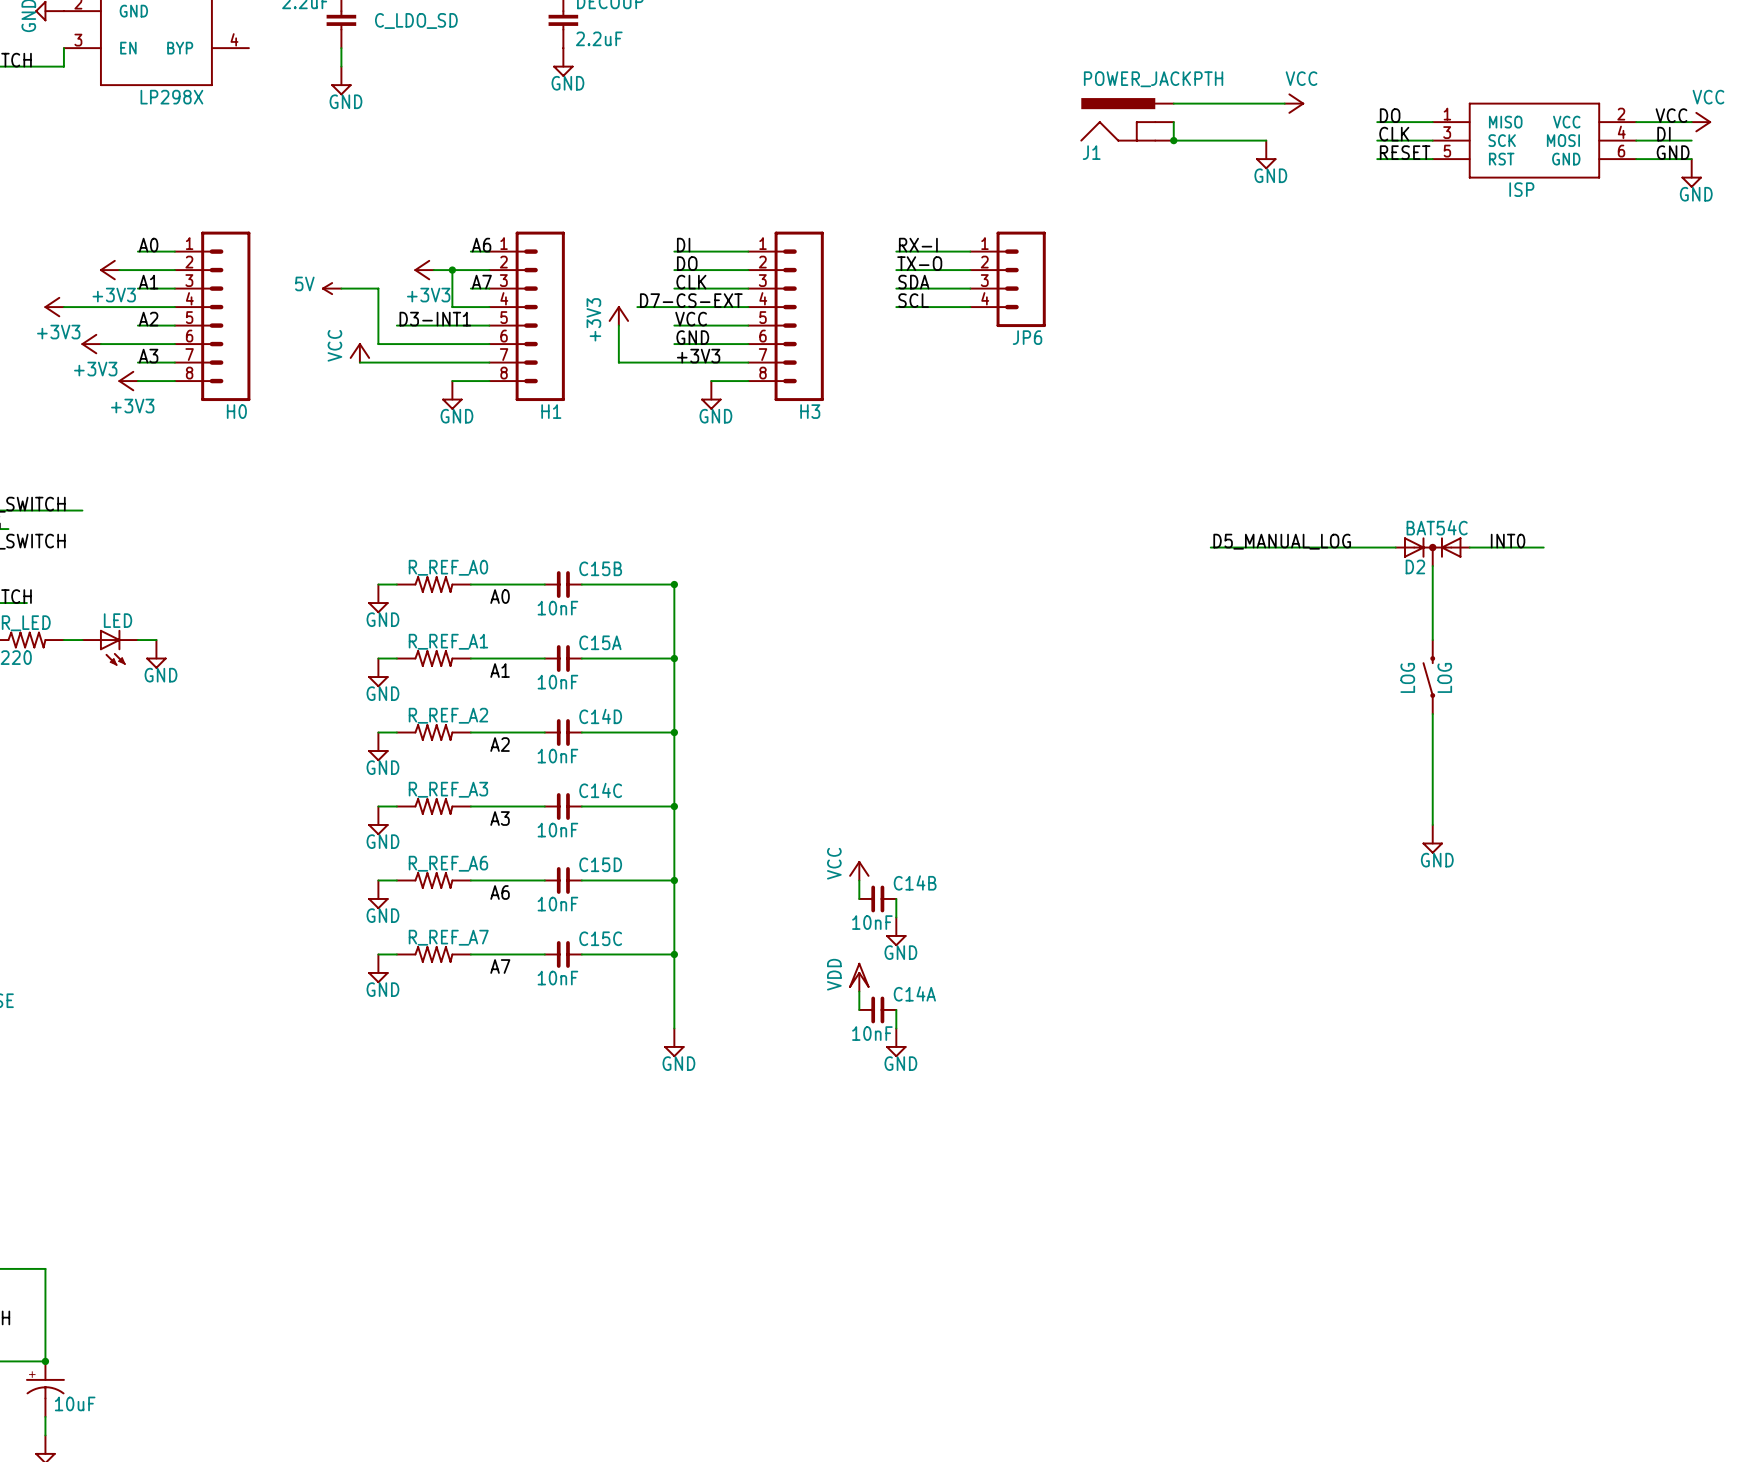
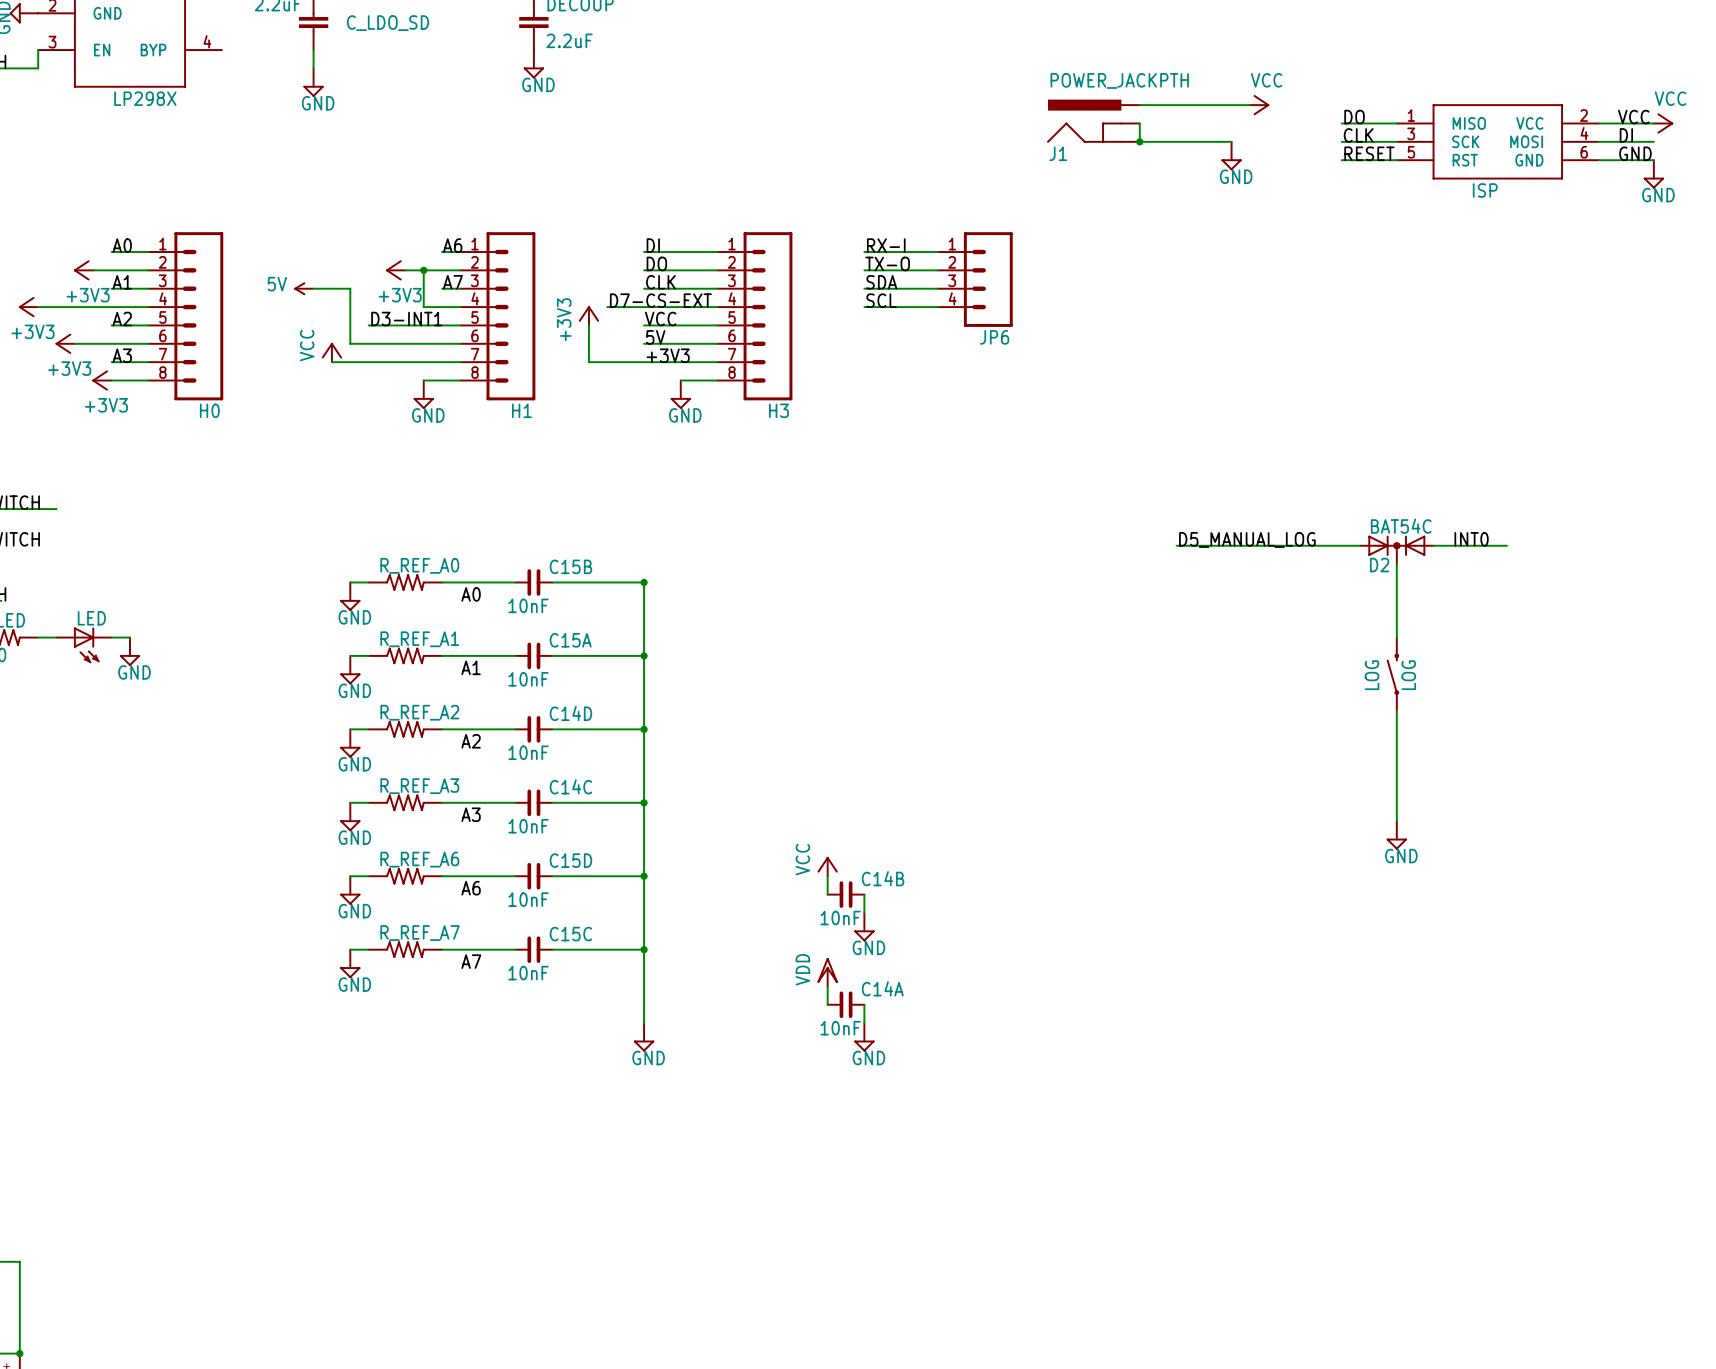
label: GND (692, 337) -> 5V (655, 337)

